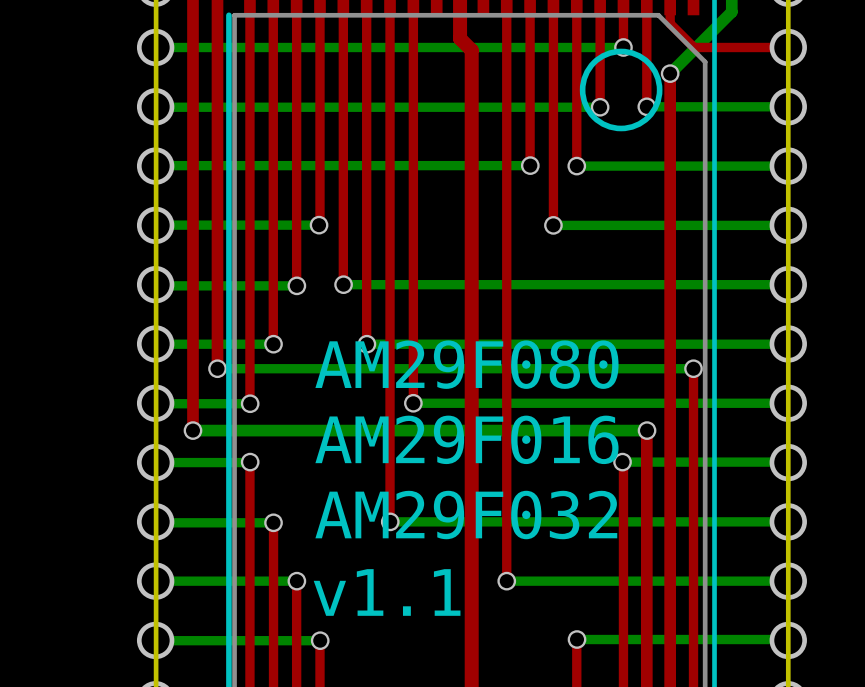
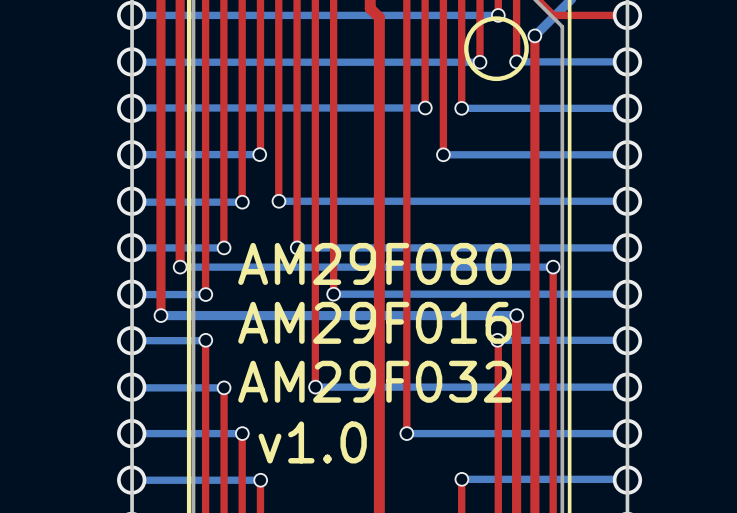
text: v1.1 (387, 592) -> v1.0 (312, 442)

